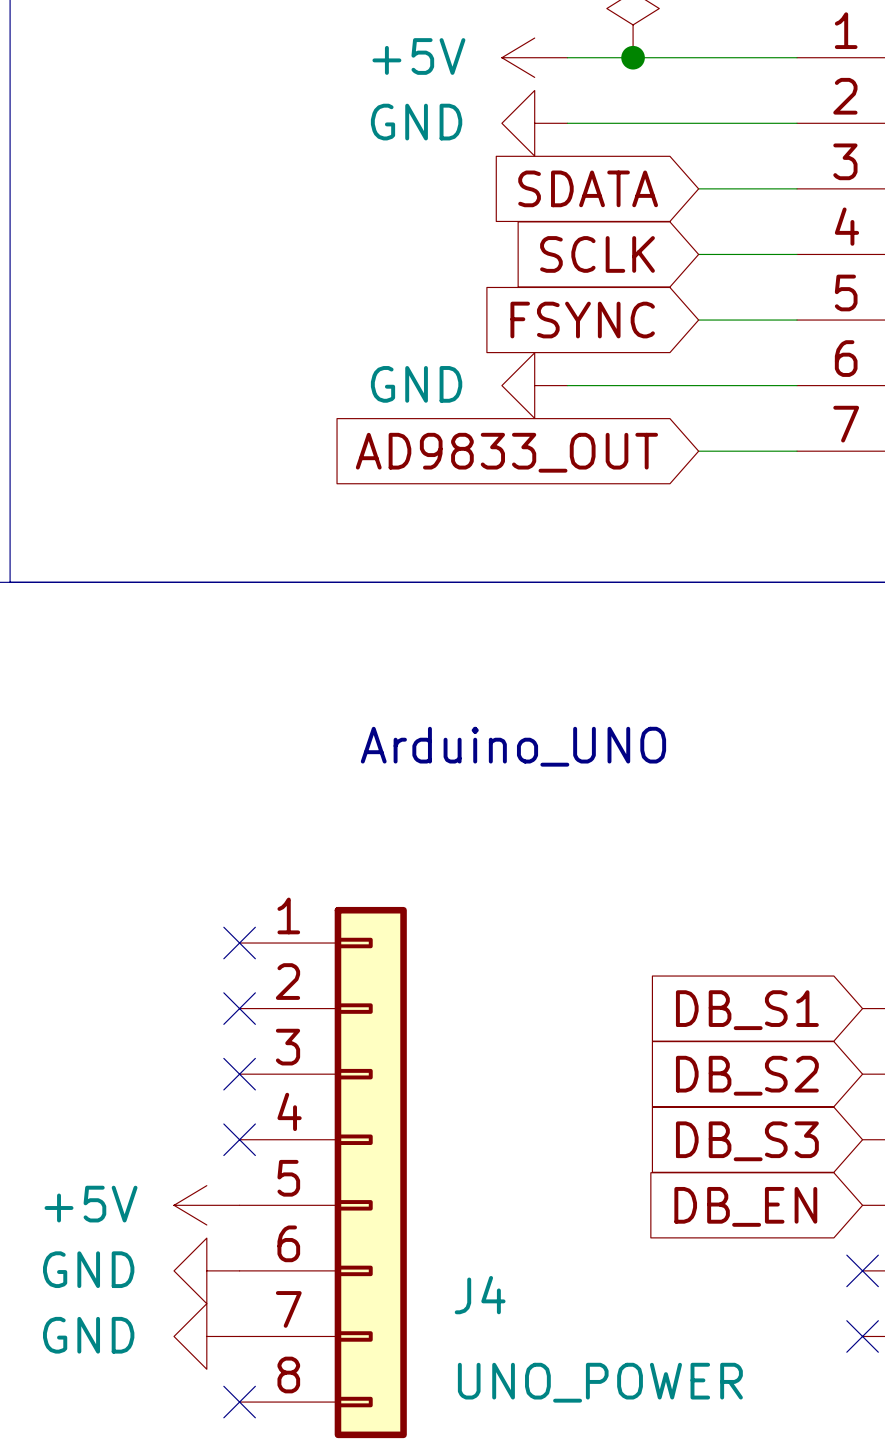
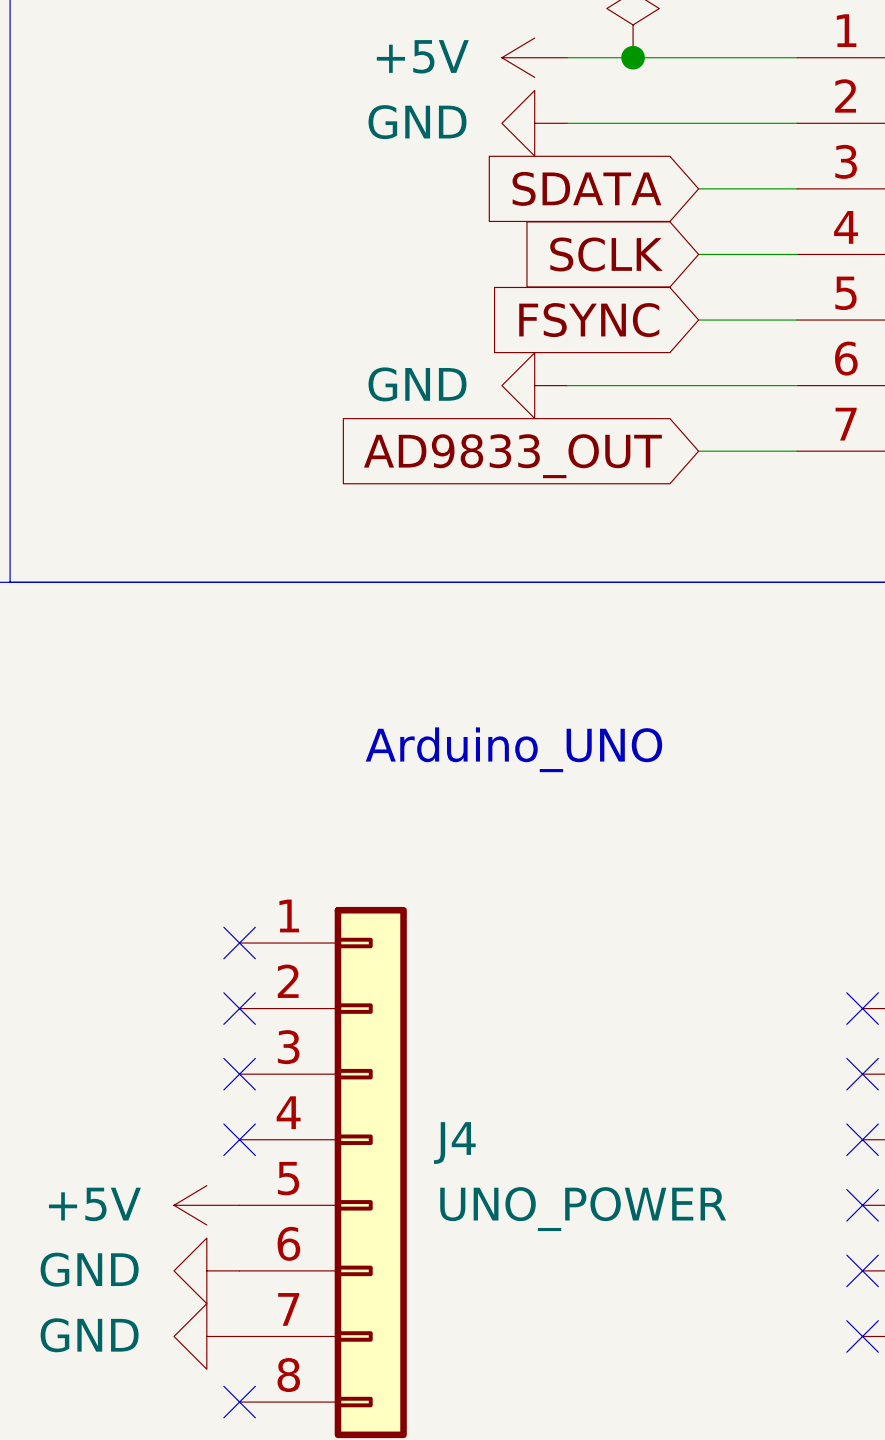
no-connect mark: none -> (862, 1008)
global label: DB_S1 (747, 1010) -> none
no-connect mark: none -> (862, 1074)
global label: DB_S2 (747, 1075) -> none
no-connect mark: none -> (862, 1139)
global label: DB_S3 (747, 1141) -> none
no-connect mark: none -> (862, 1205)
global label: DB_EN (745, 1206) -> none
J4 name position: J4 (480, 1295) -> J4 (454, 1143)
J4 value position: UNO_POWER (600, 1382) -> UNO_POWER (583, 1209)

